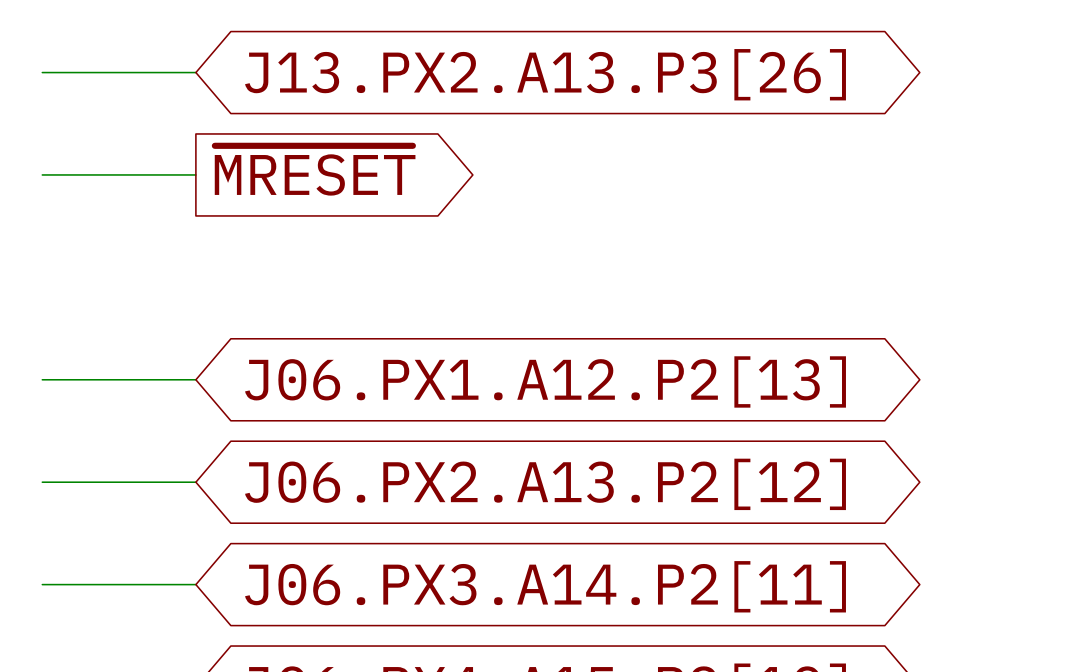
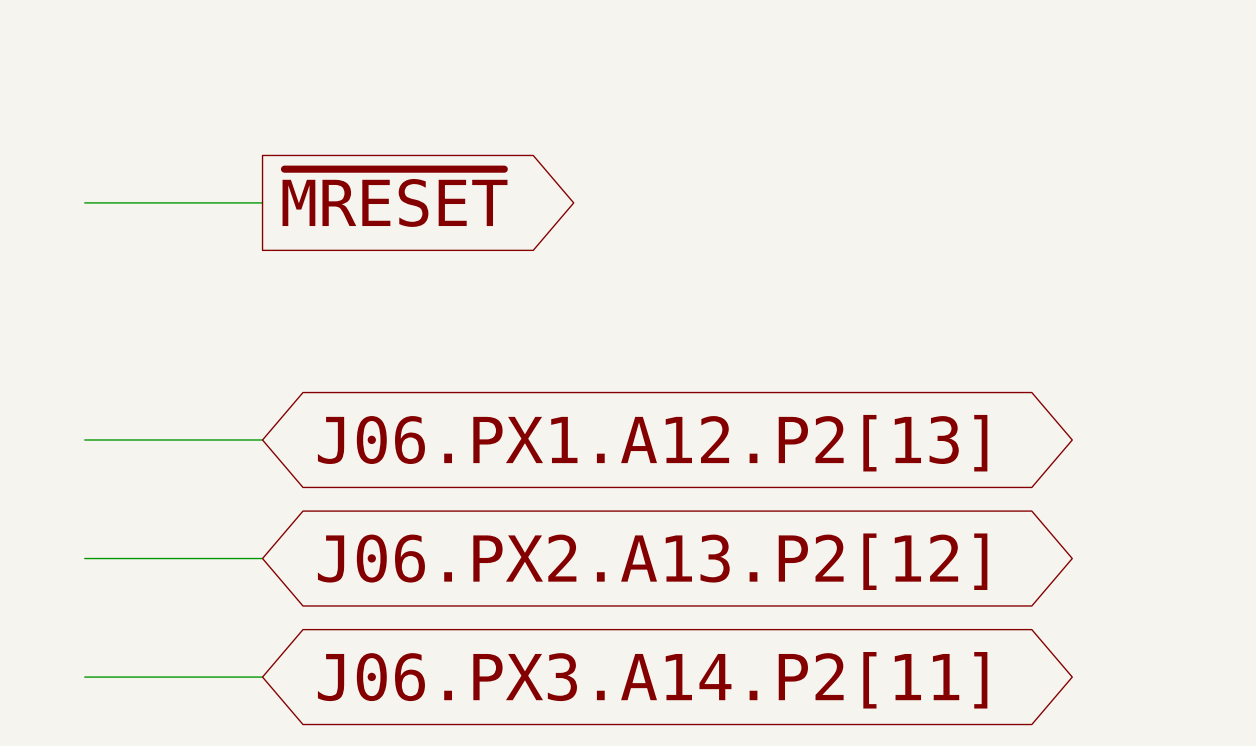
wire: (42, 72) (195, 72) -> none
global label: J13.PX2.A13.P3[26] (545, 74) -> none

